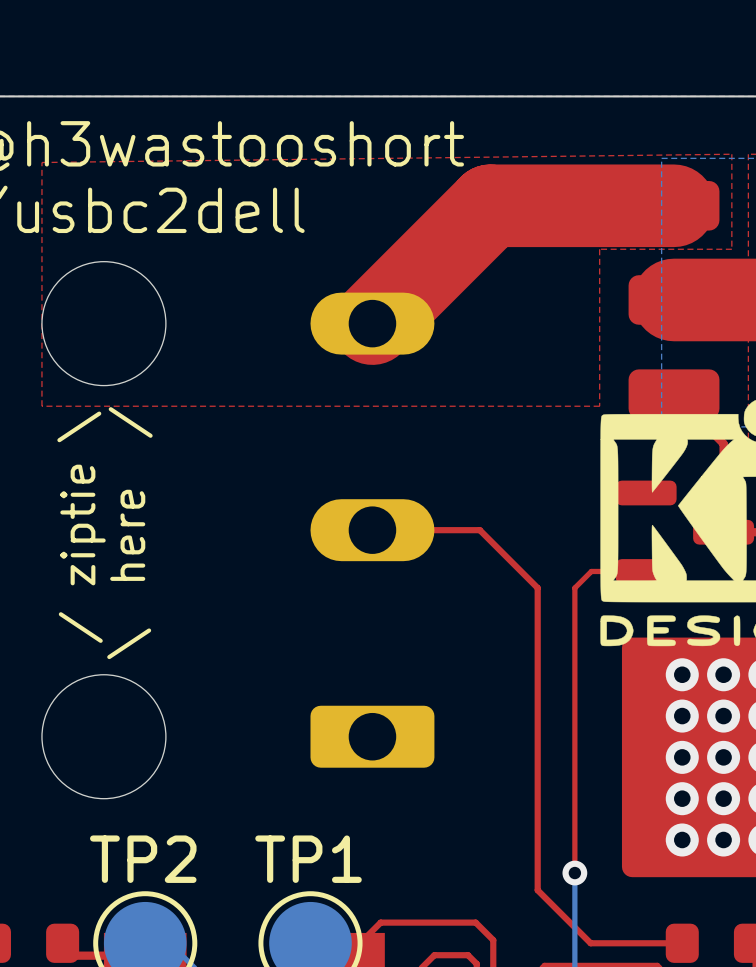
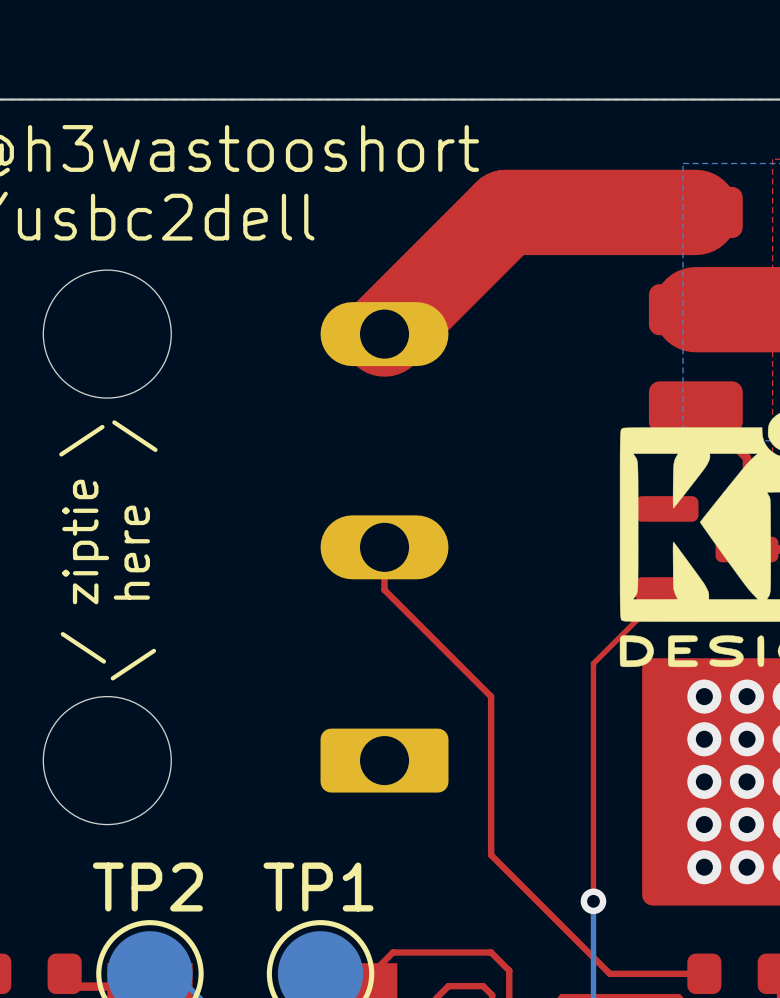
top zone outline: (731, 154) (731, 249) (599, 249) (599, 406) (41, 406) (41, 162) (731, 154) -> none
top track: (372, 530) (479, 530) (537, 588) (537, 890) -> (384, 547) (384, 589) (491, 696) (491, 855) (555, 919)
top track: (646, 571) (591, 571) (574, 588) (574, 642) -> (667, 589) (593, 663)

